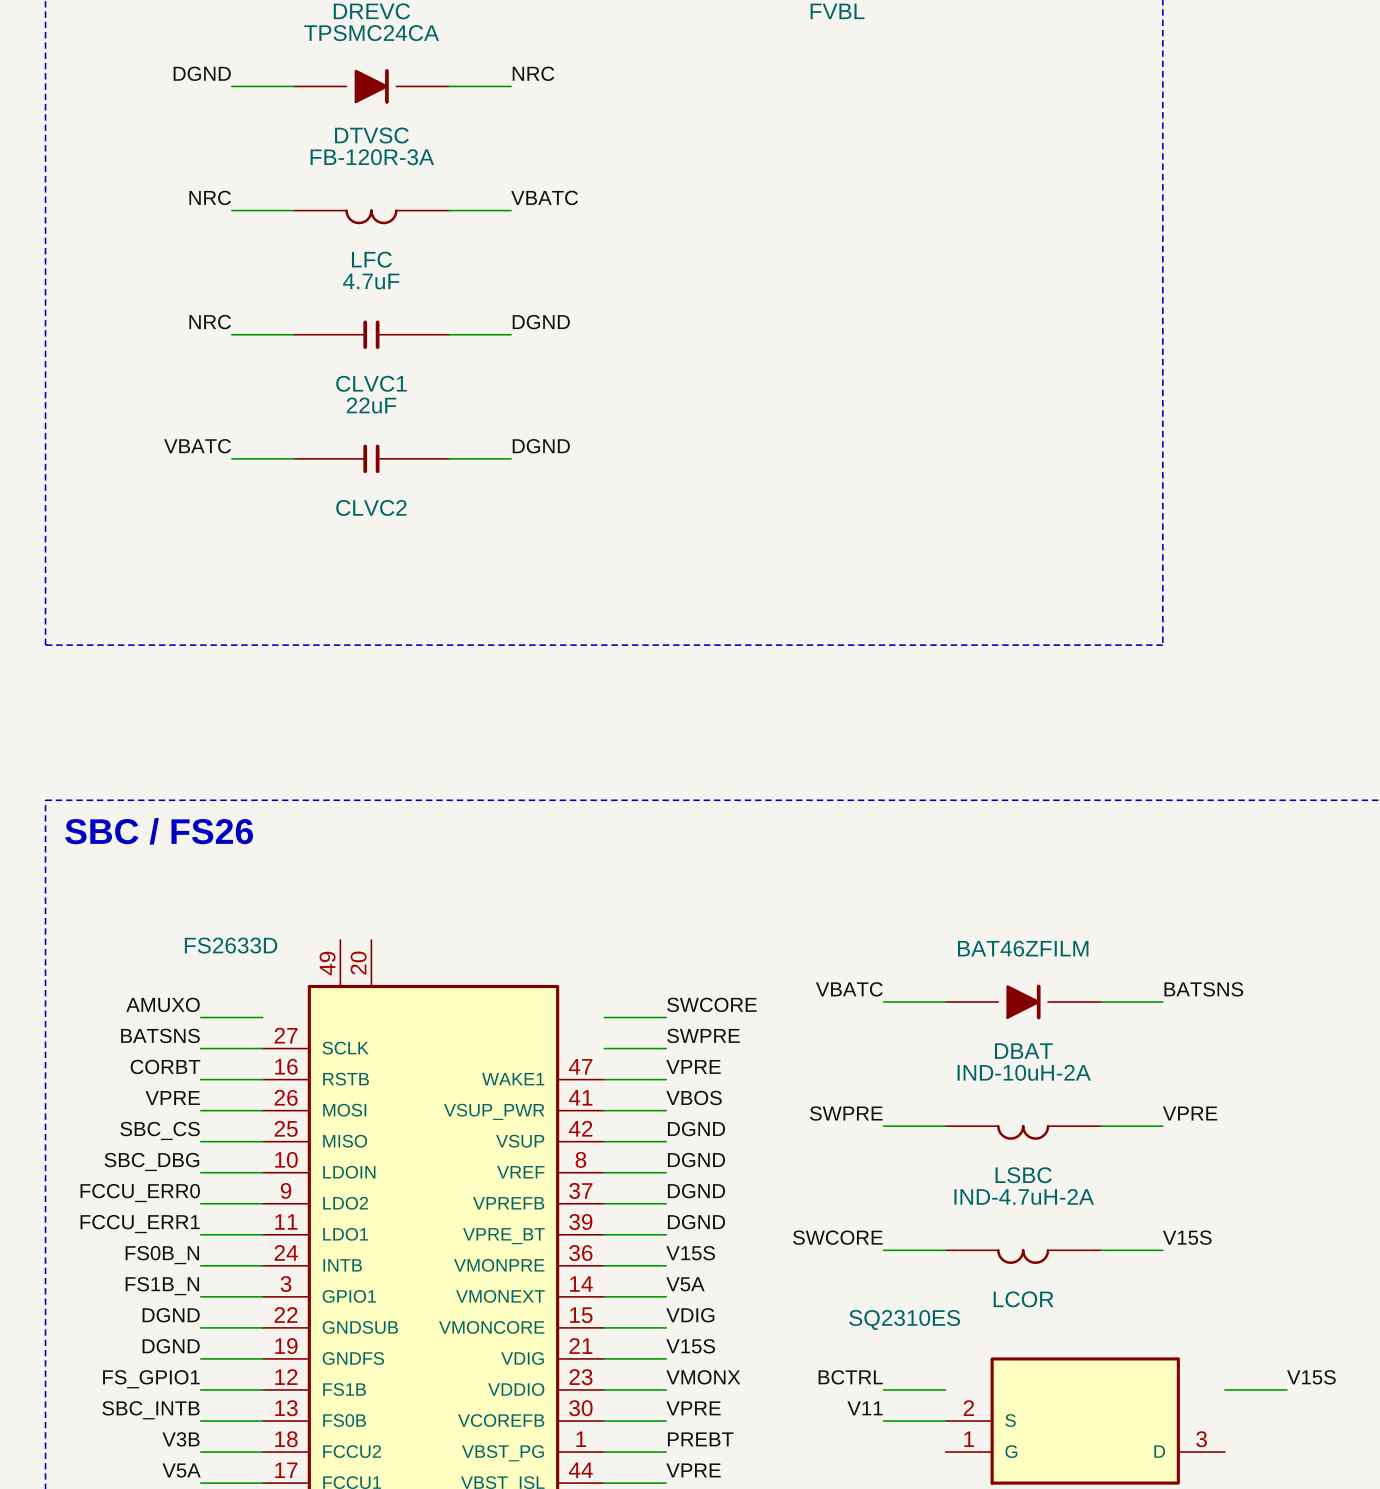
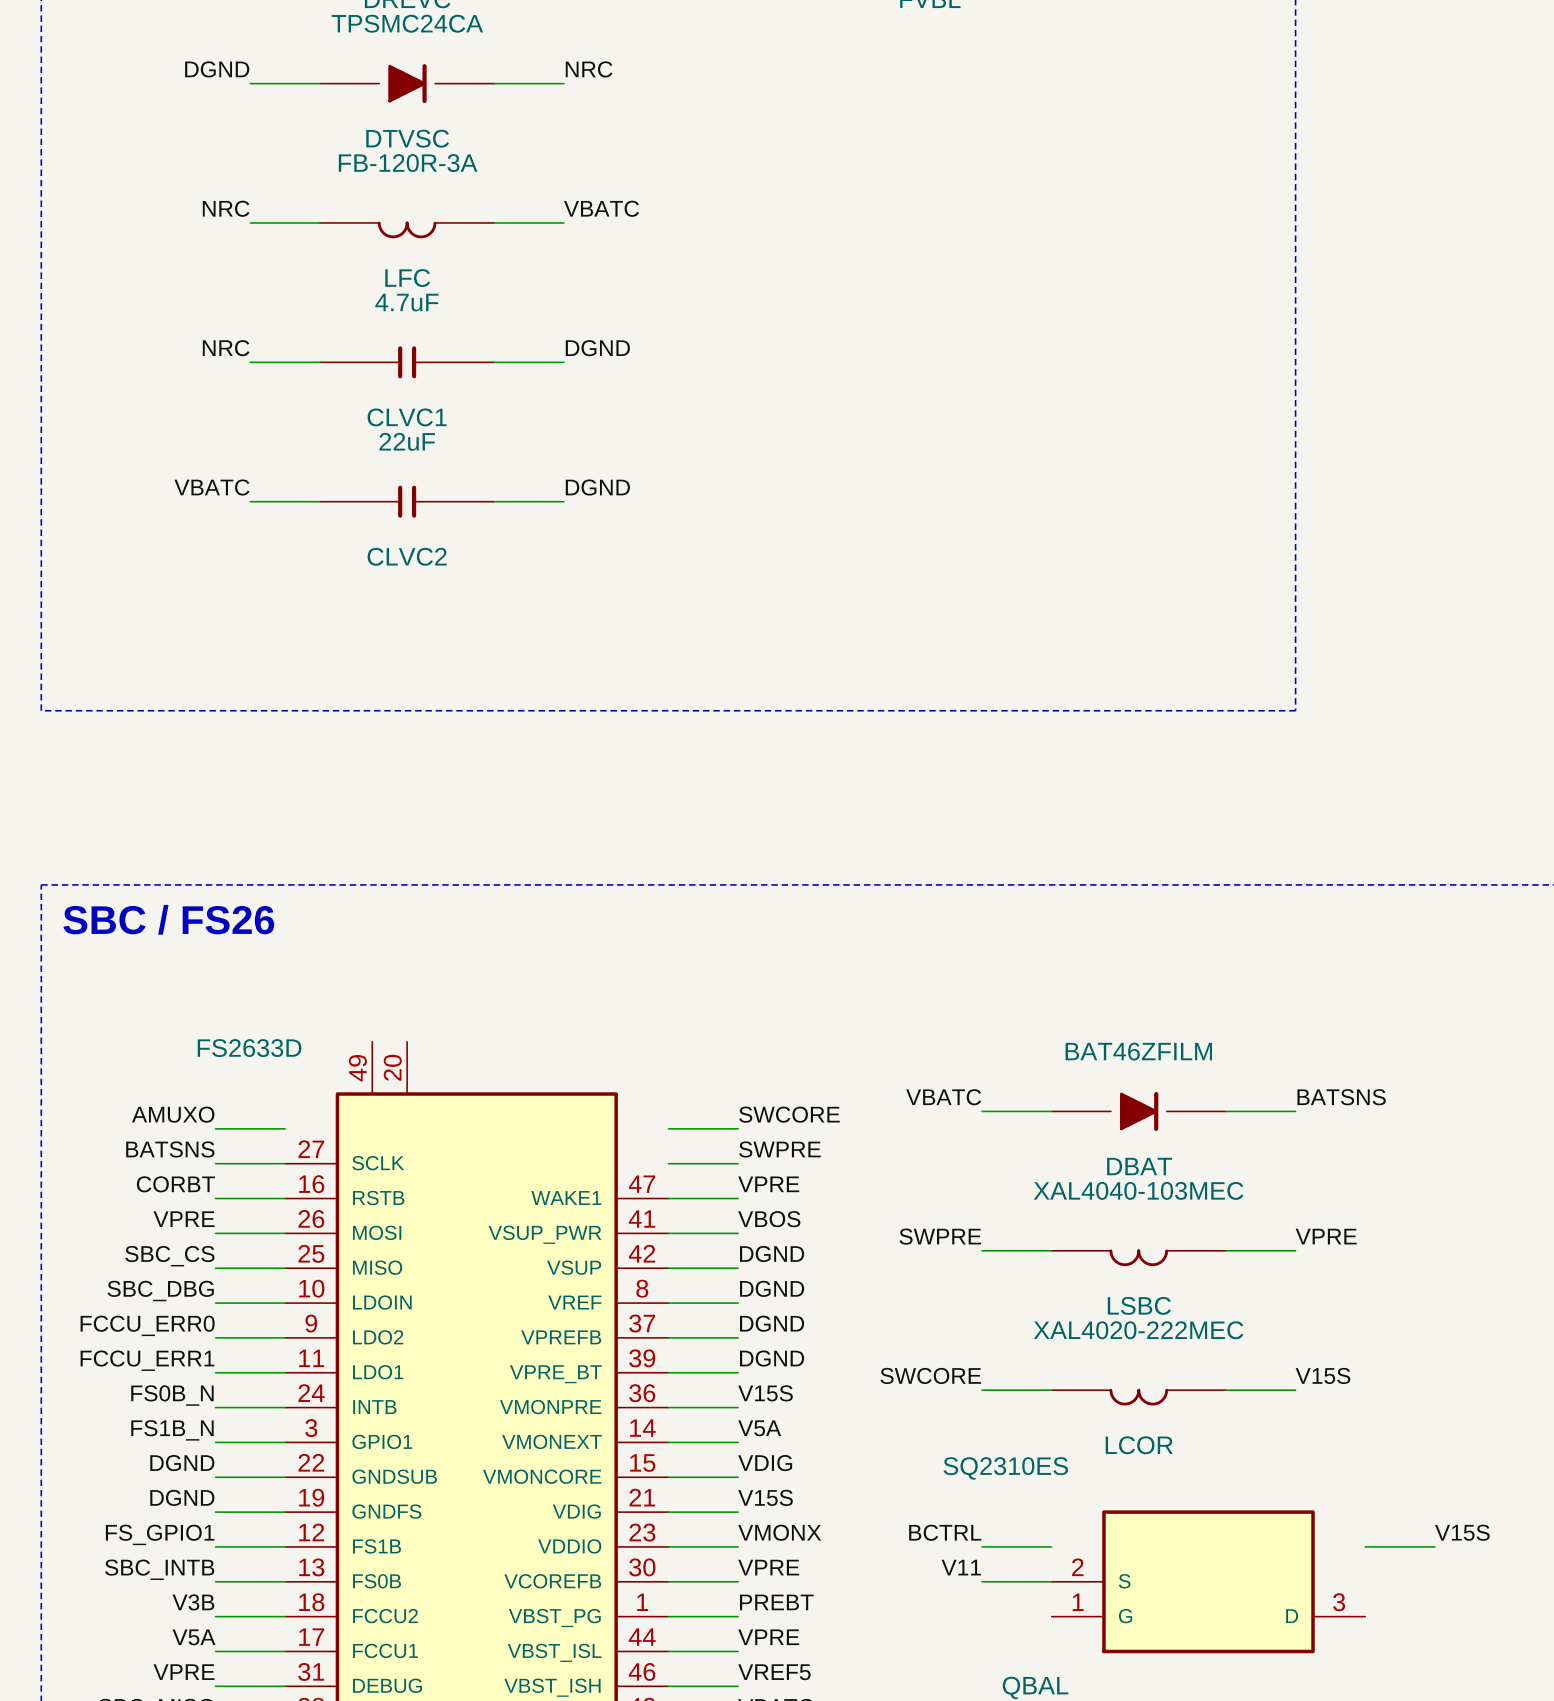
LSBC value: IND-10uH-2A (1024, 1072) -> XAL4040-103MEC (1138, 1190)
LCOR value: IND-4.7uH-2A (1024, 1196) -> XAL4020-222MEC (1138, 1330)

